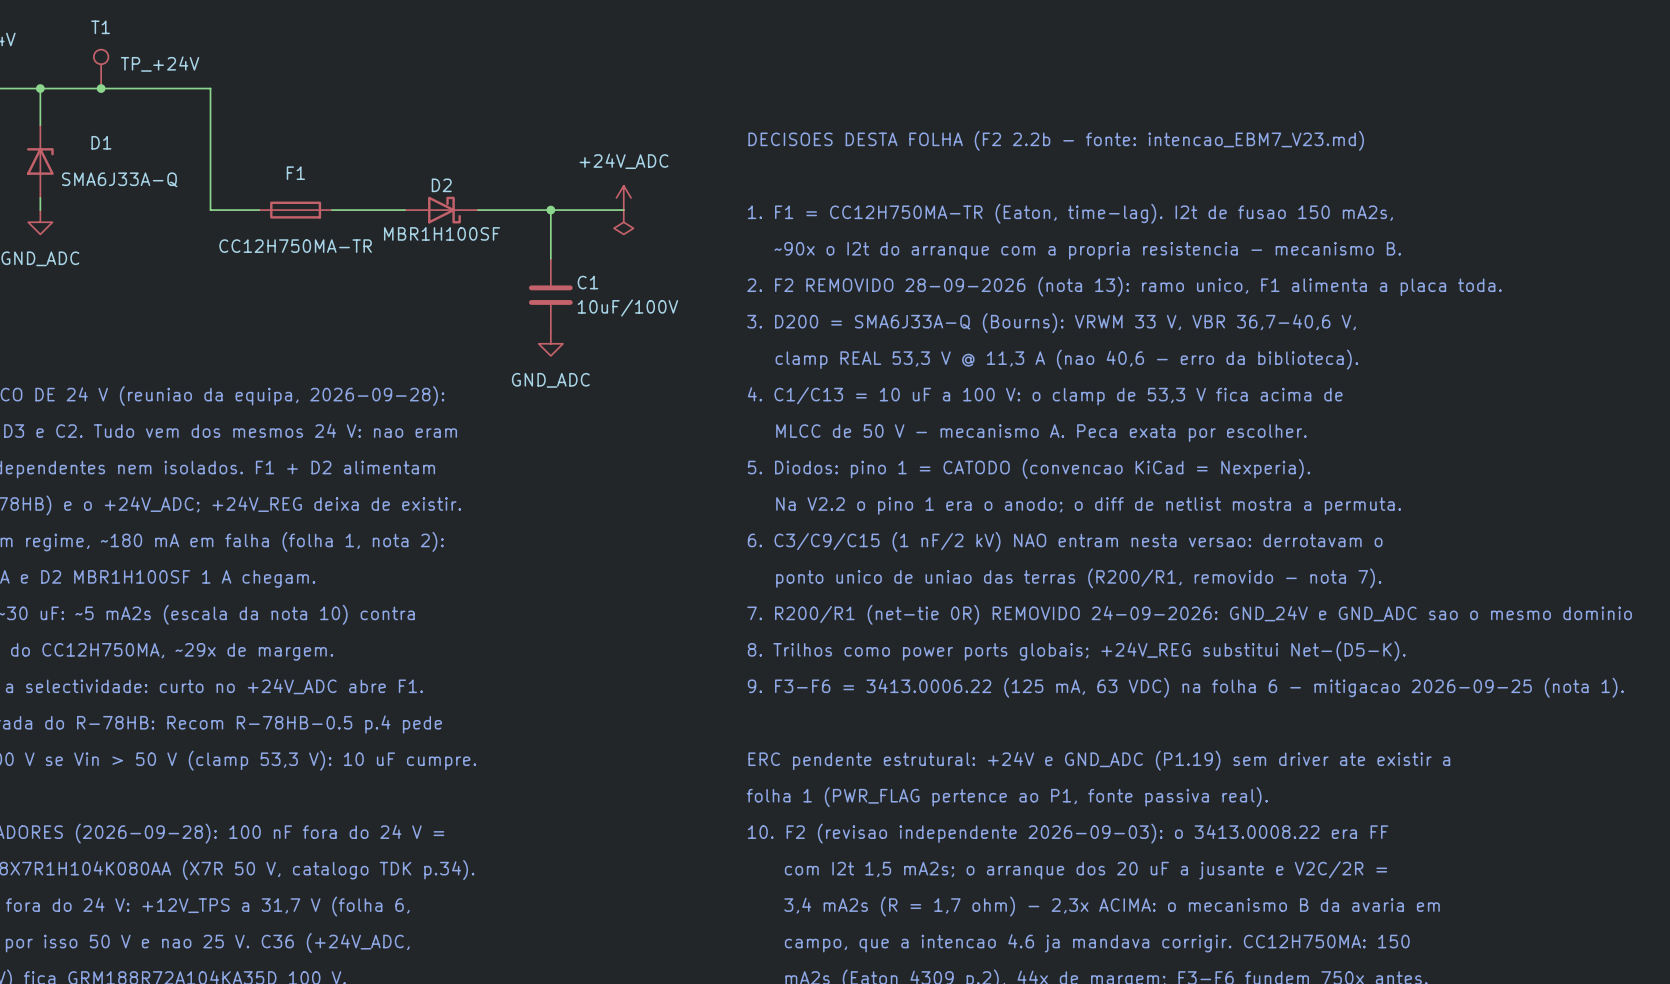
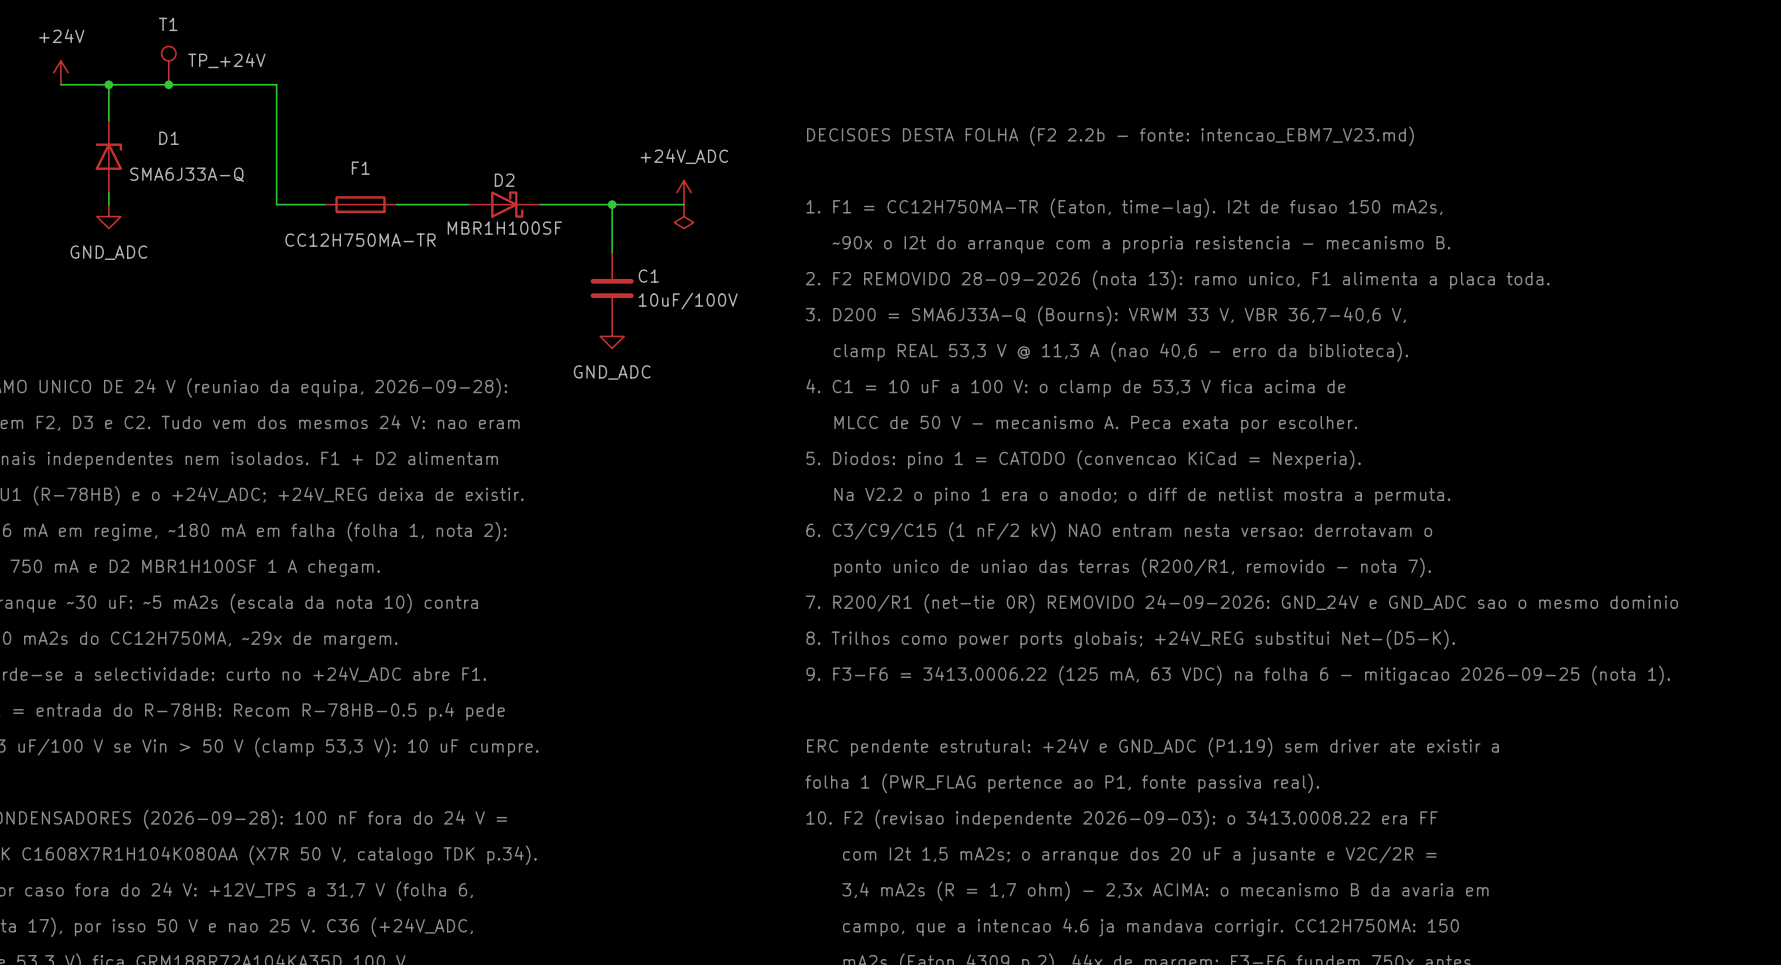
text: 4. C1/C13 = 10 uF a 100 V: o clamp de 53,3 V fica acima de (1045, 396) -> 4. C1 = 10 uF a 100 V: o clamp de 53,3 V fica acima de (1075, 388)

